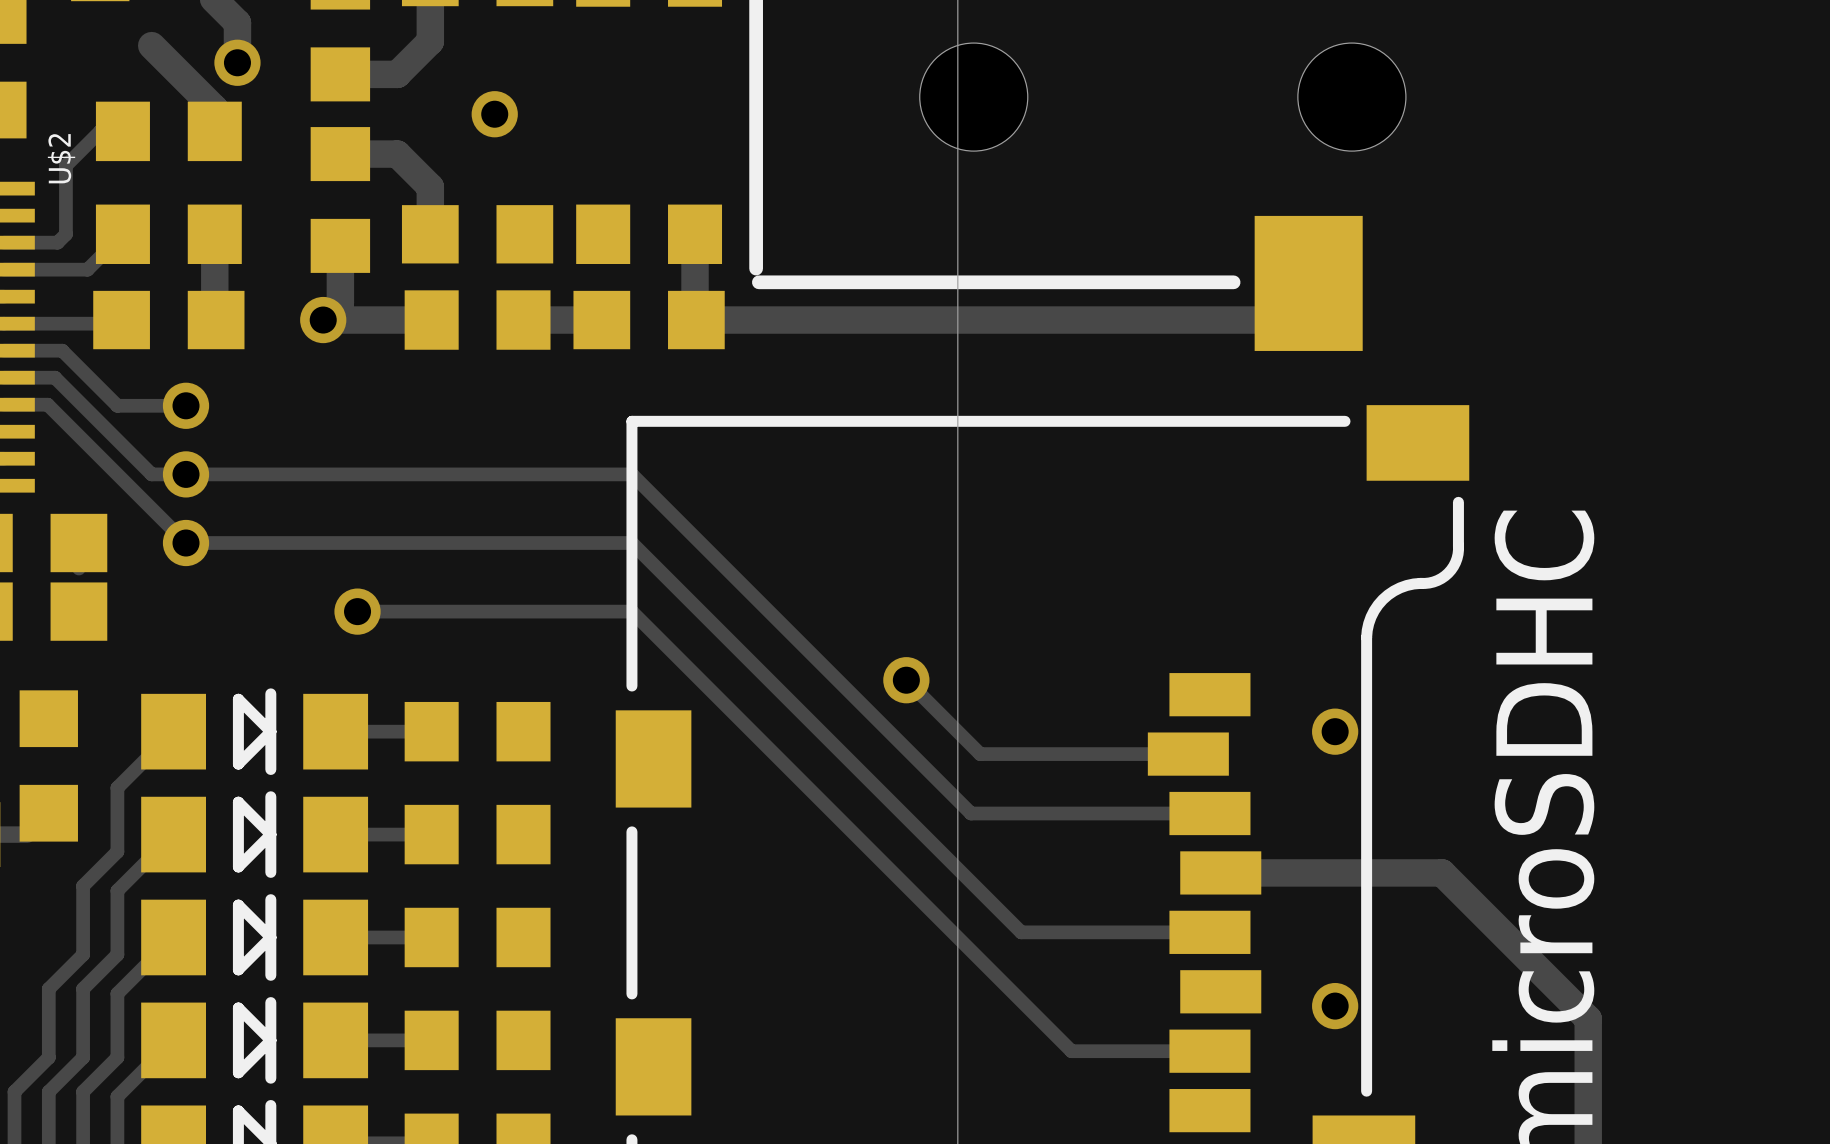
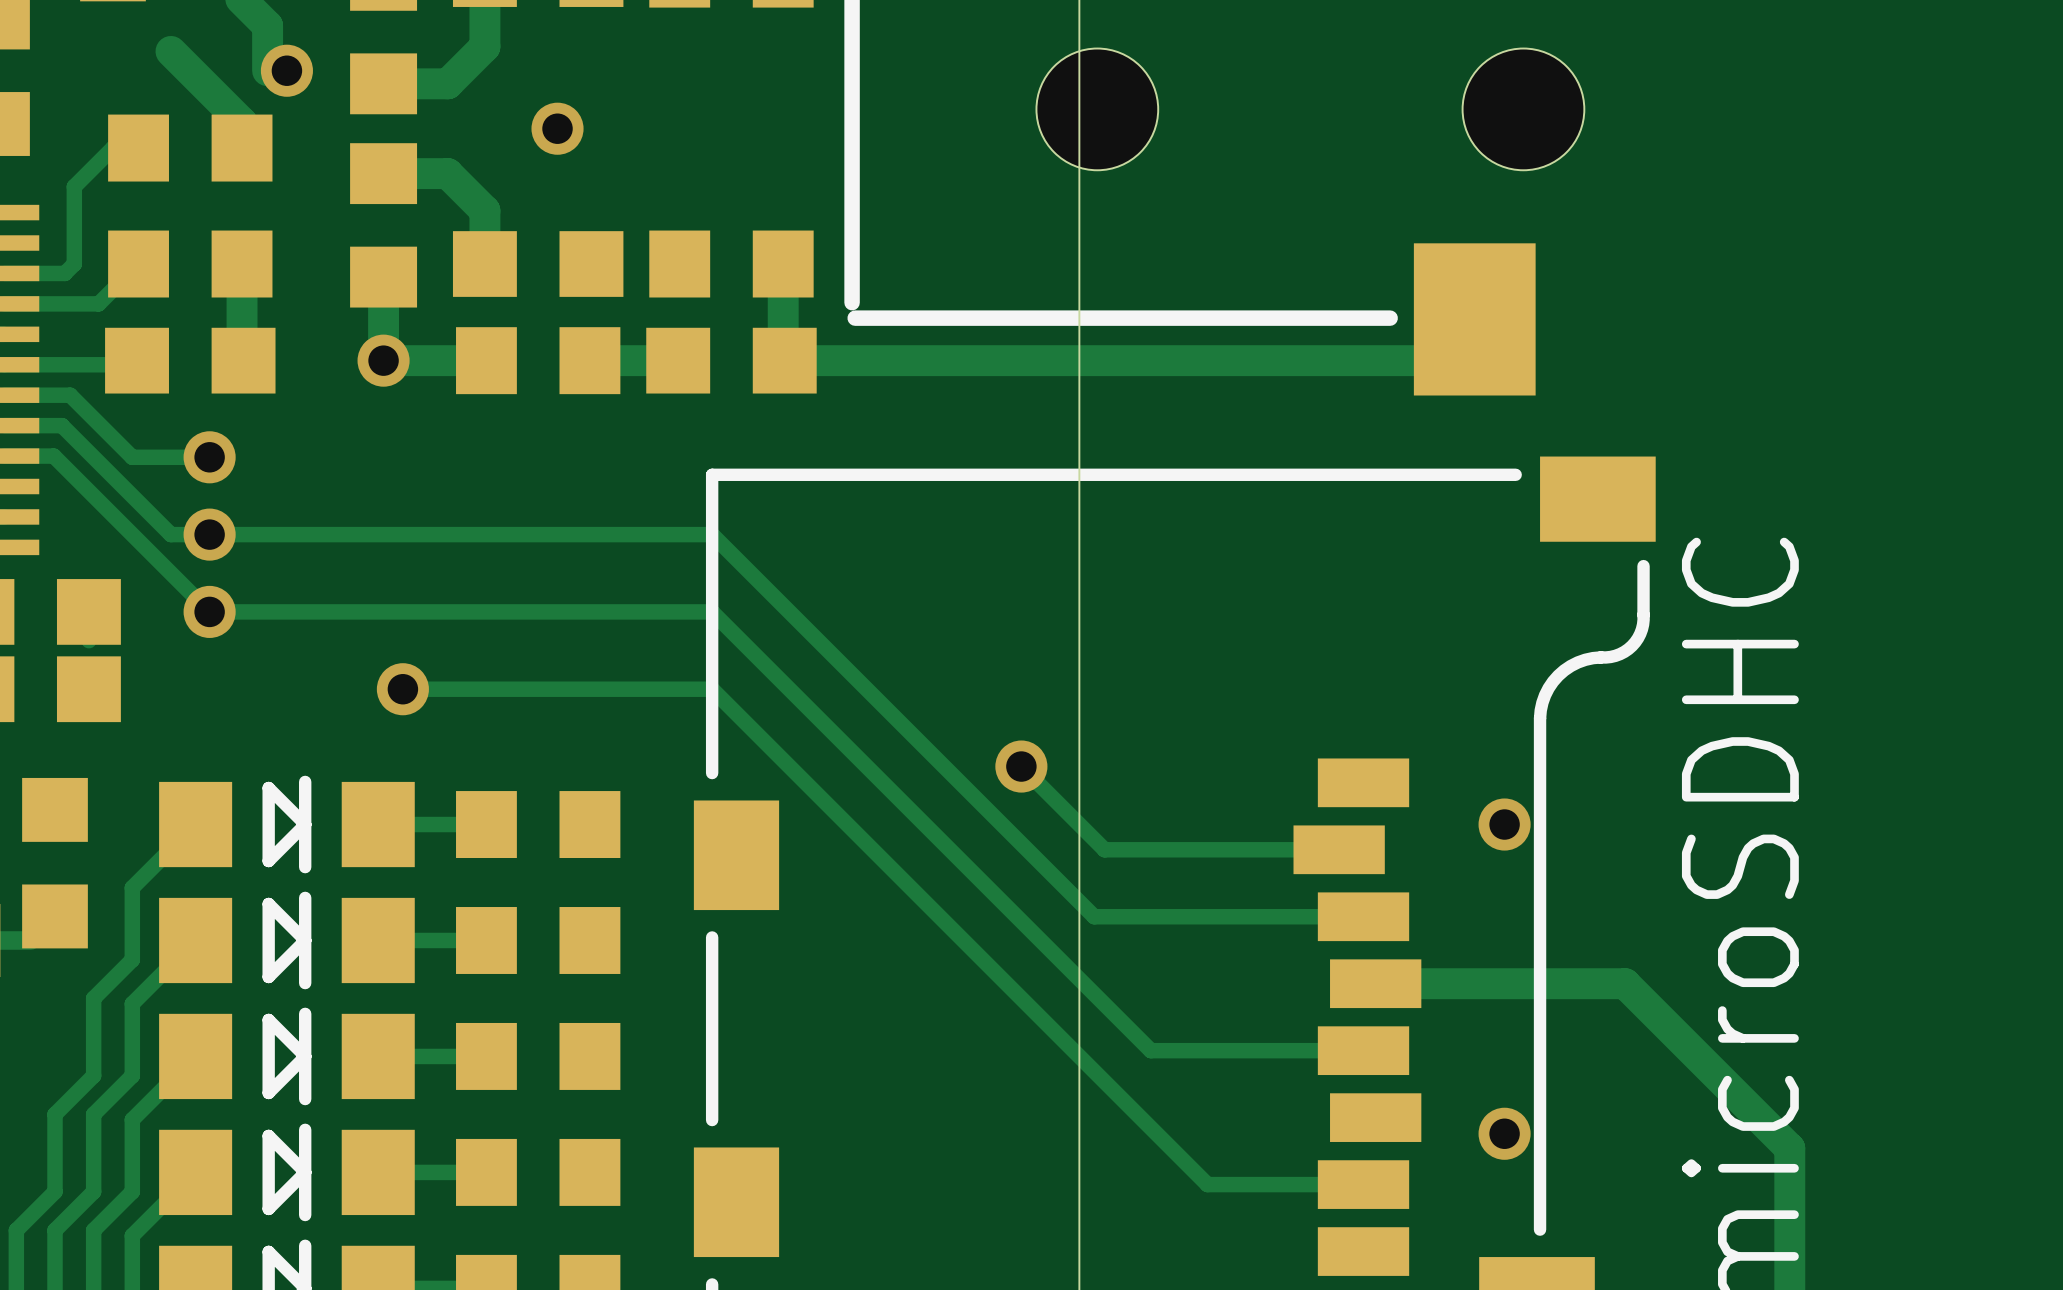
via position: (237, 62) -> (286, 70)
U$2 name: U$2 (61, 158) -> none
via position: (323, 320) -> (383, 360)

